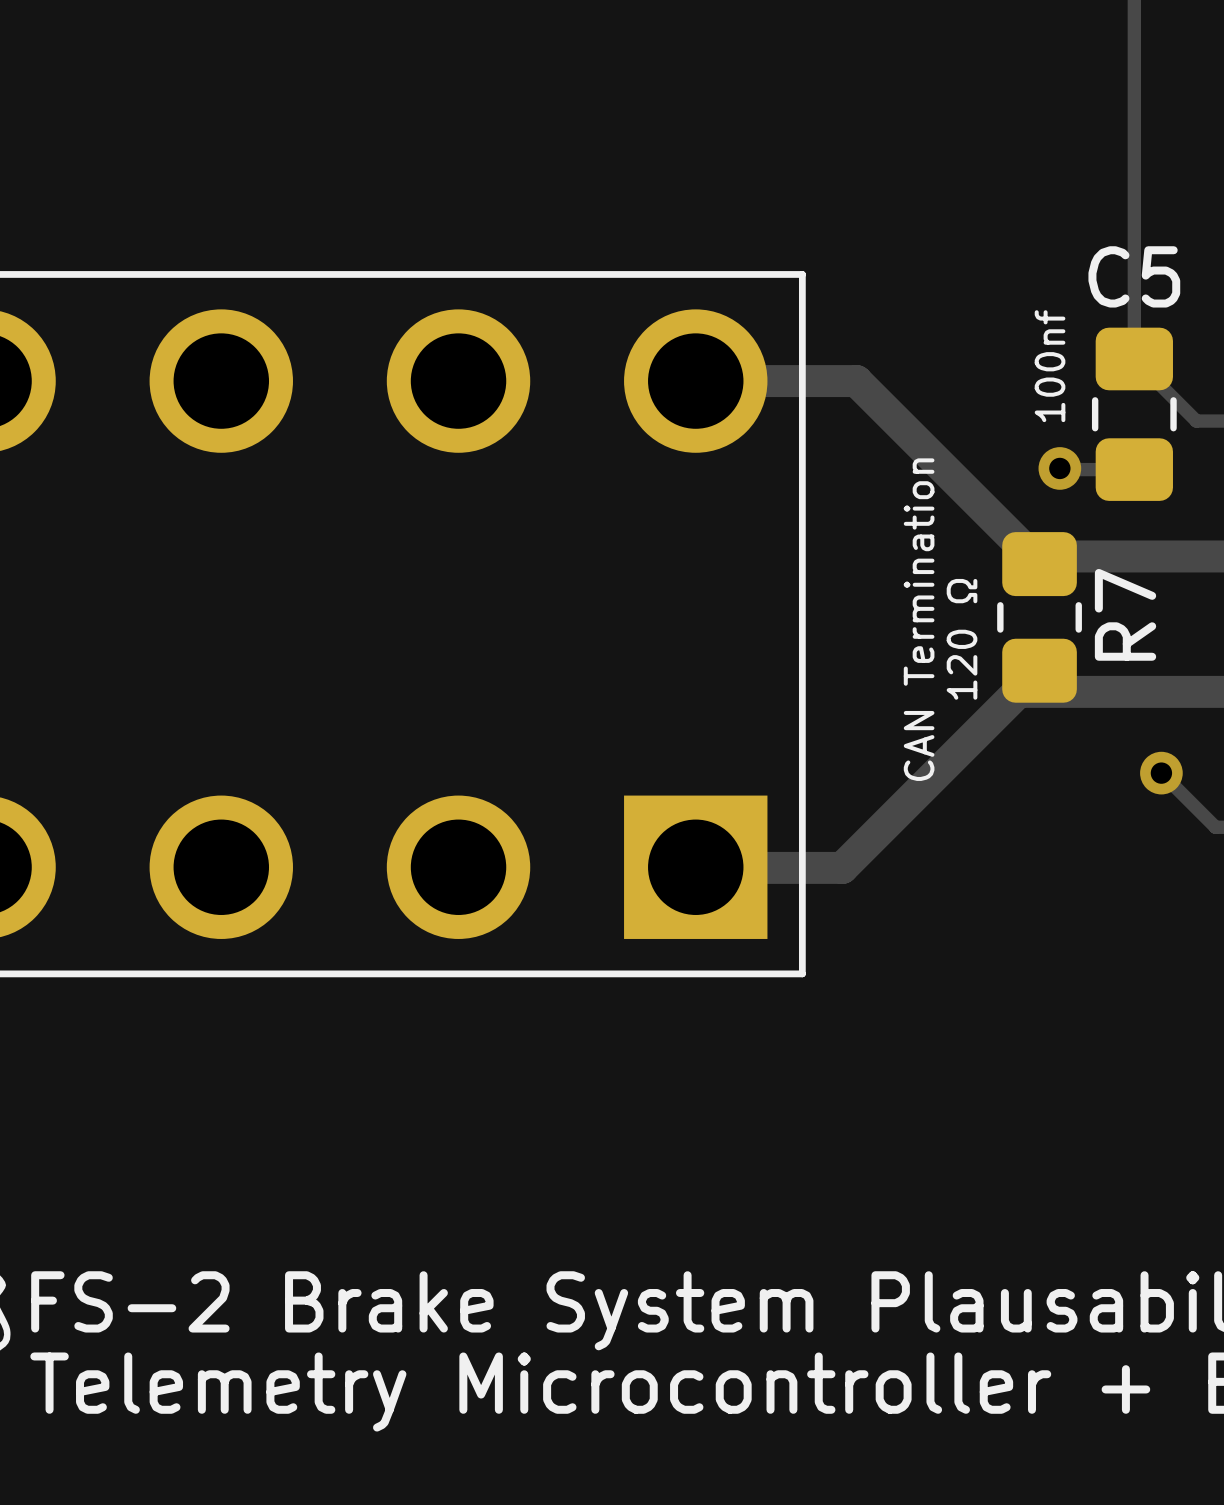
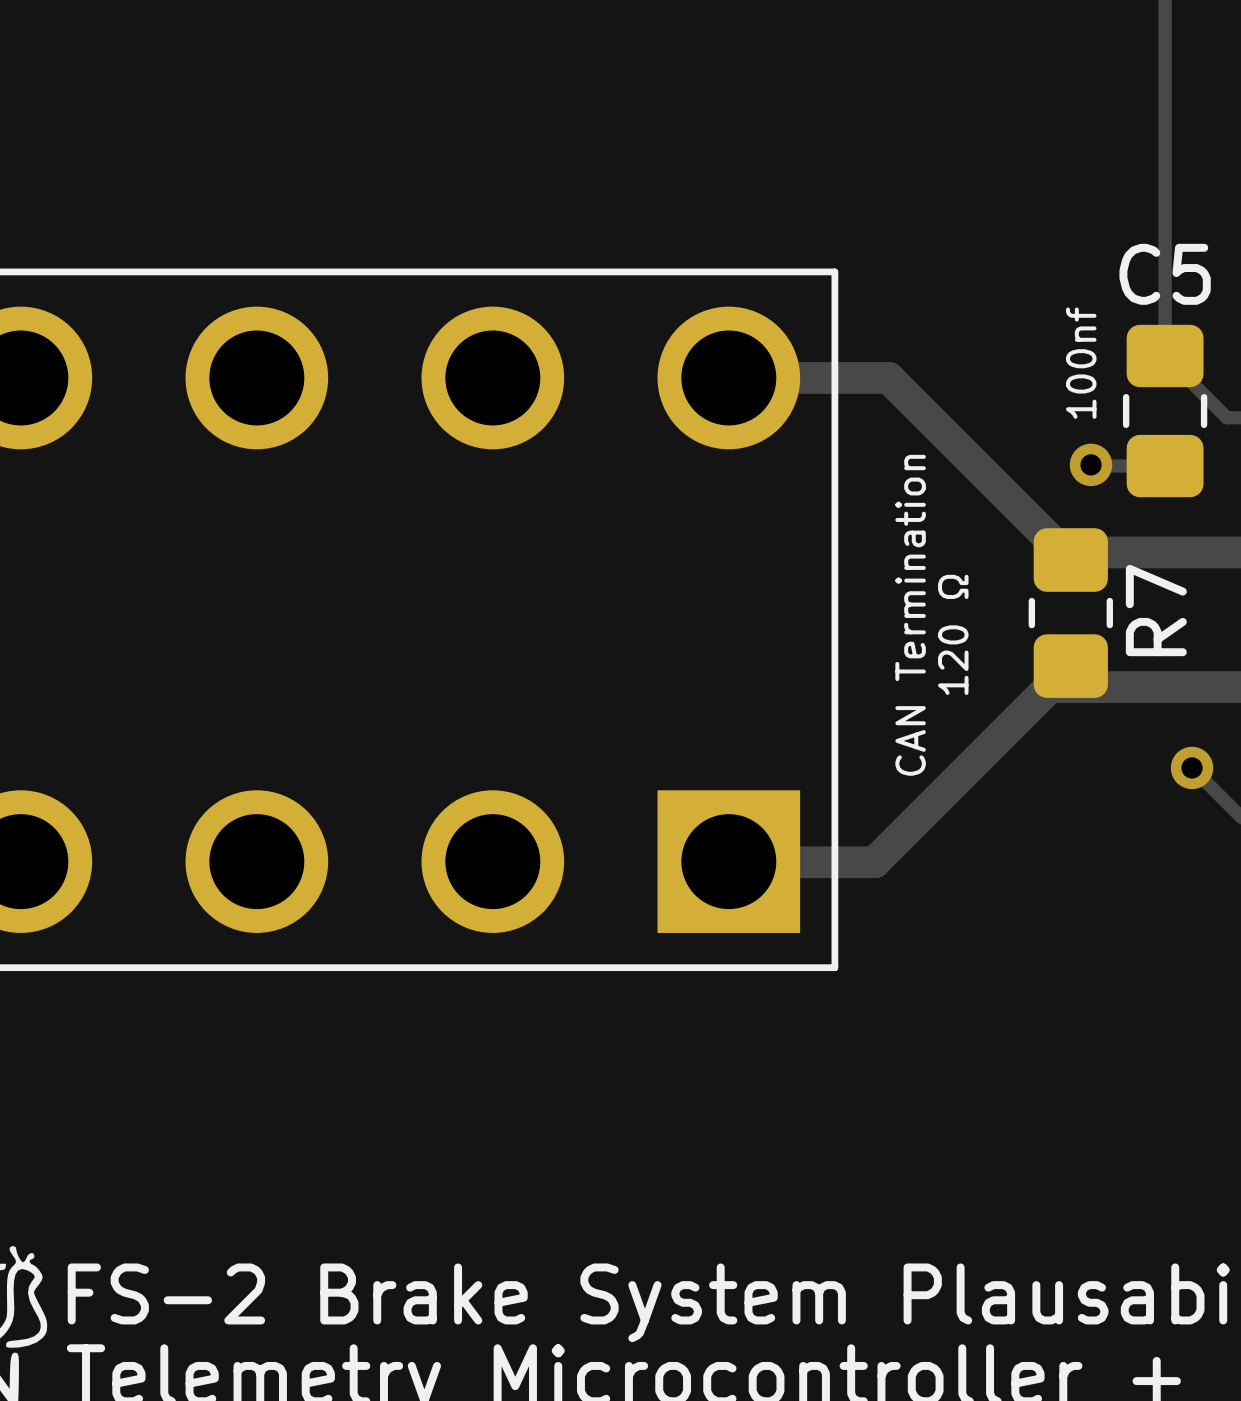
text position: CAN Termination (919, 619) -> CAN Termination (910, 615)
text position: 120 Ω (962, 639) -> 120 Ω (953, 634)

